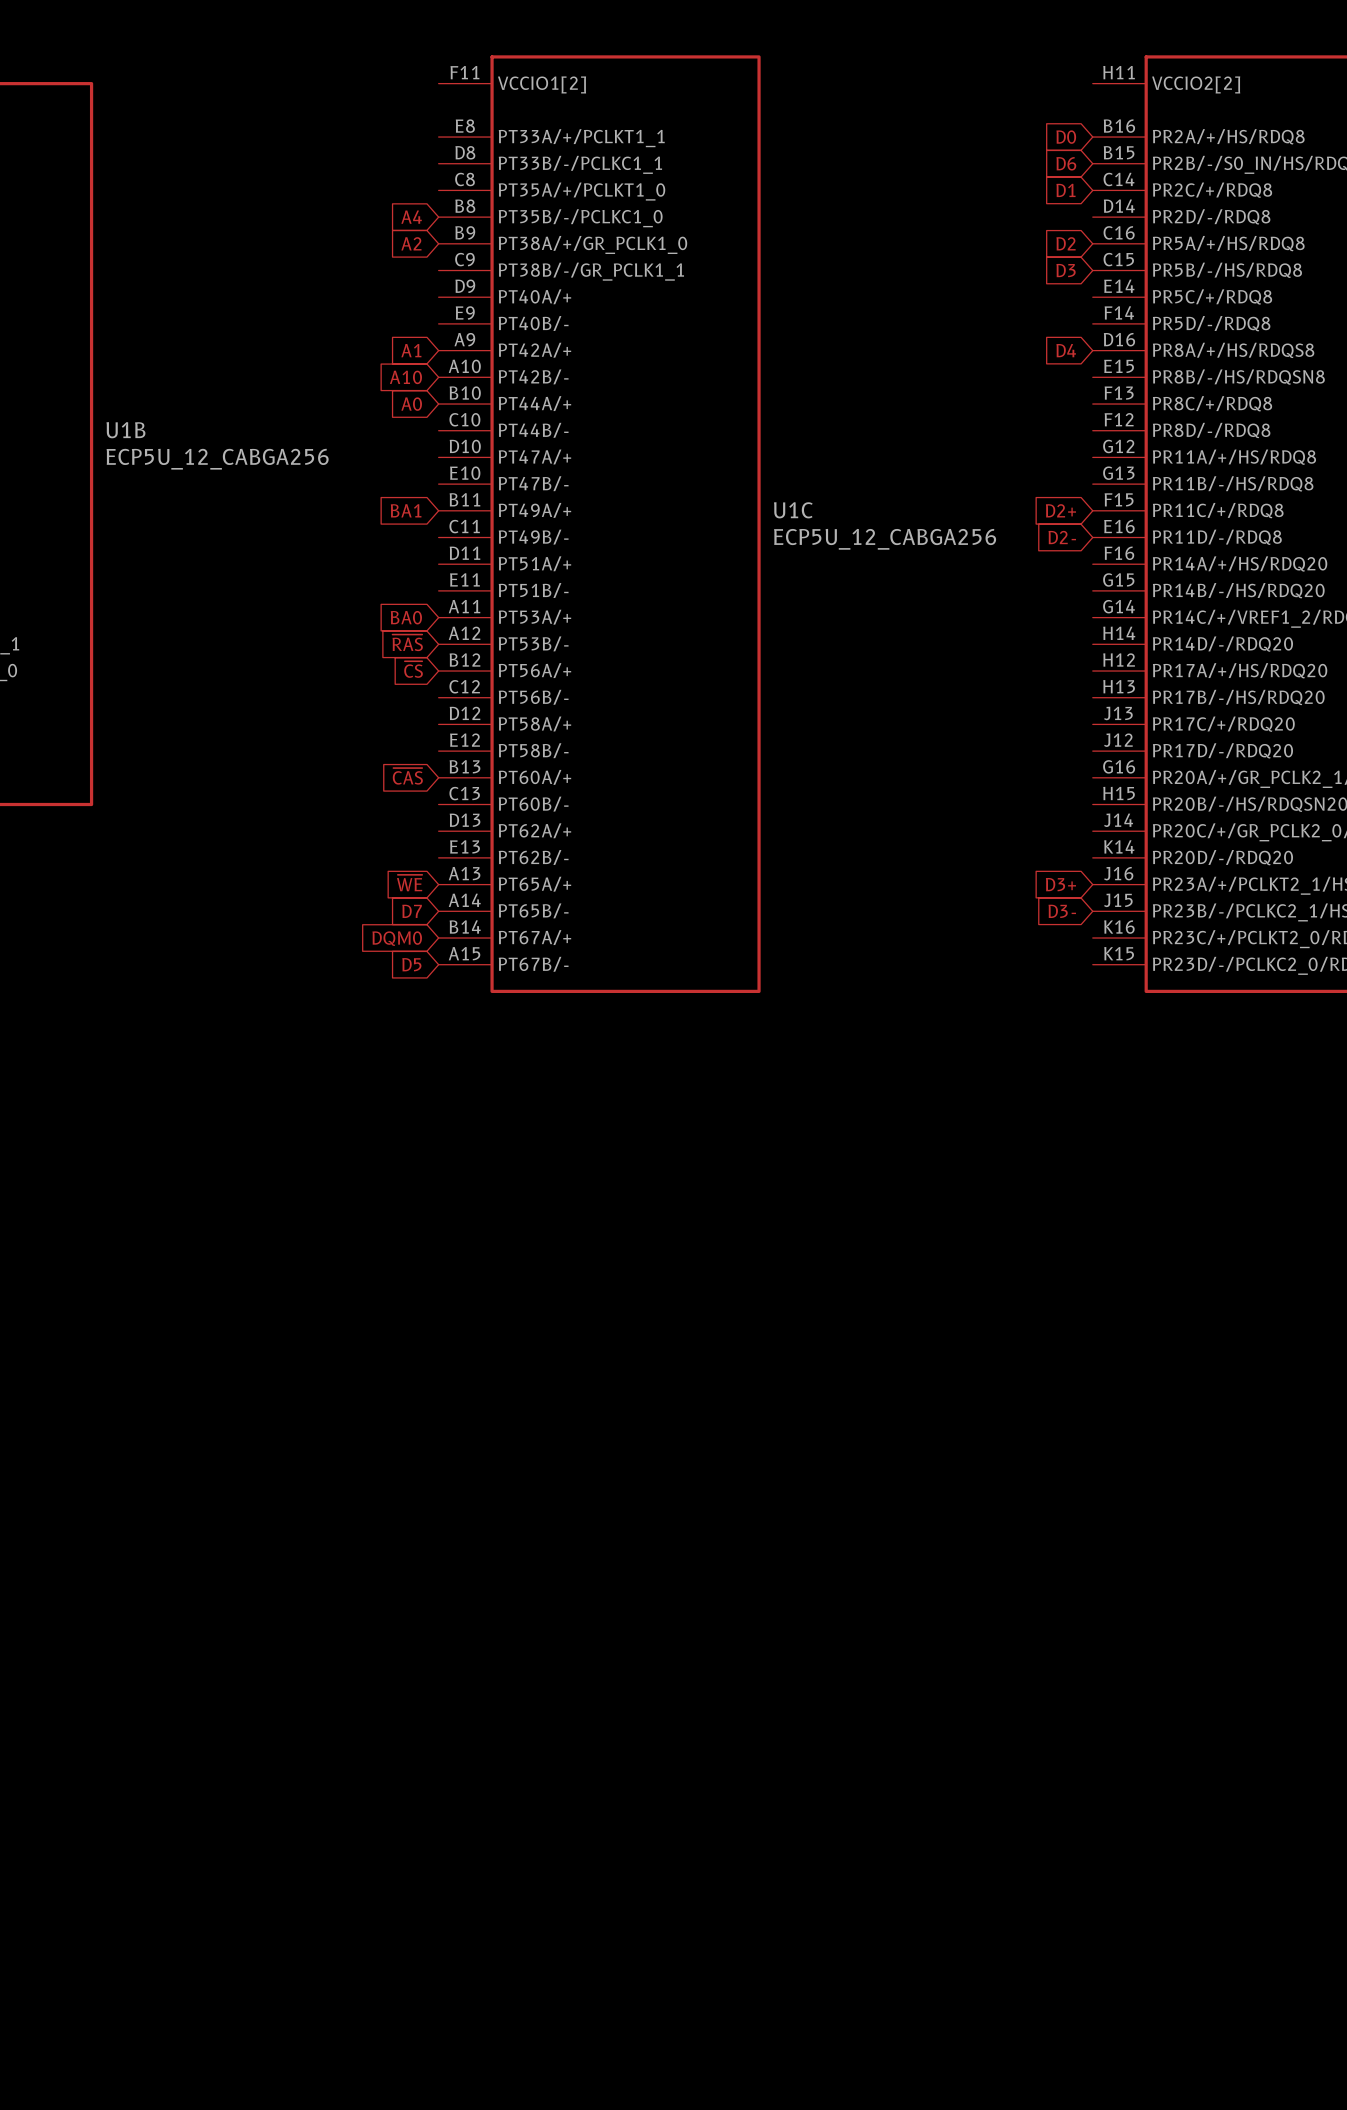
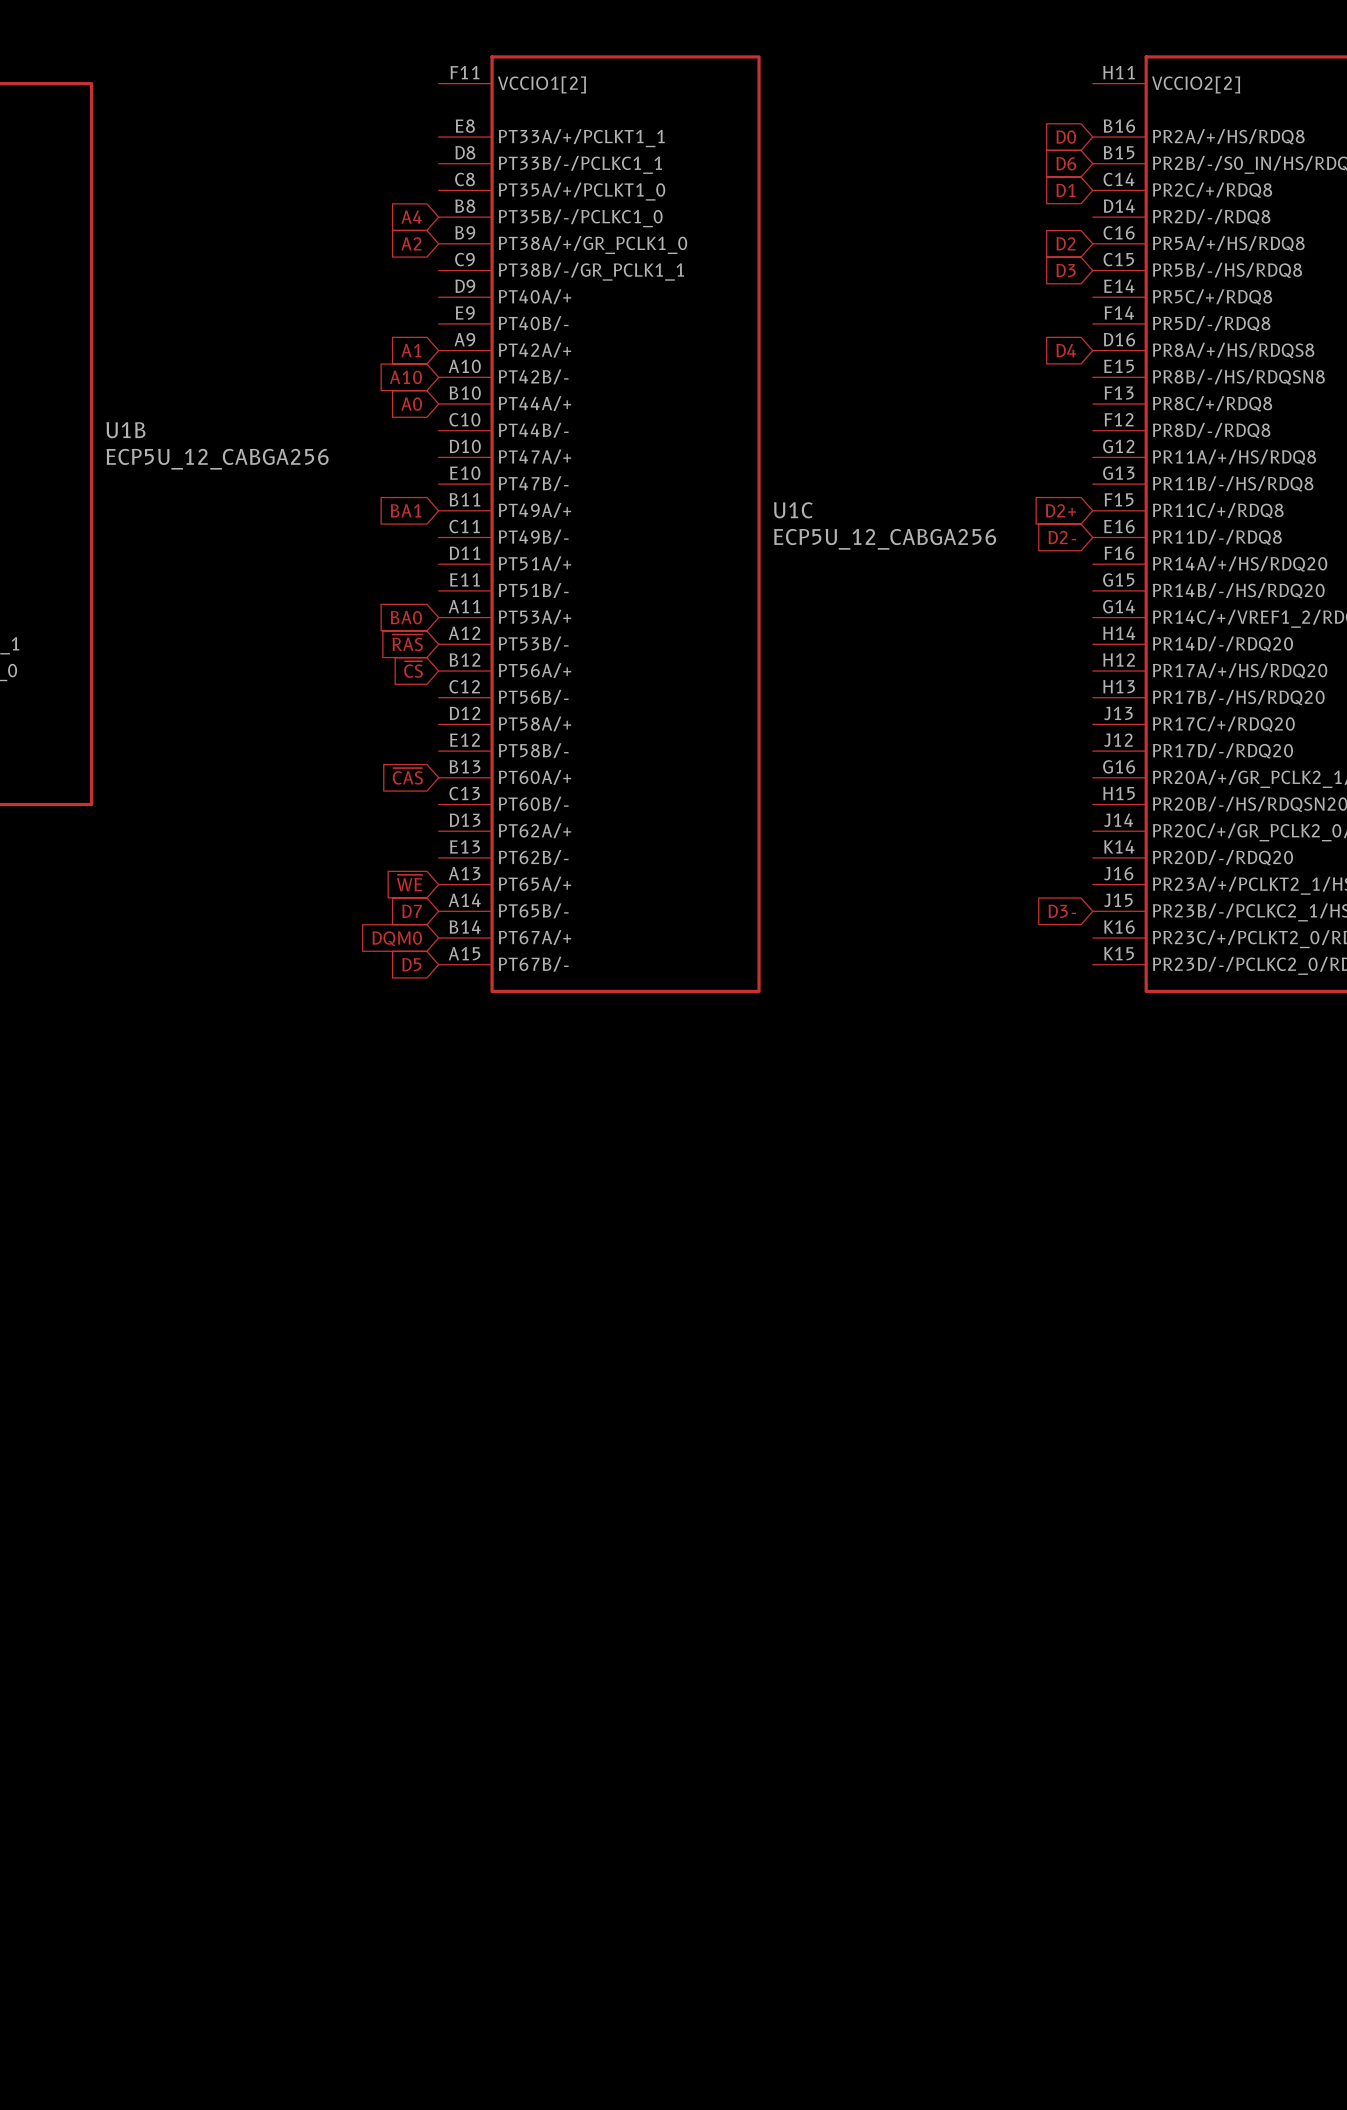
global label: D3+ (1060, 884) -> none

